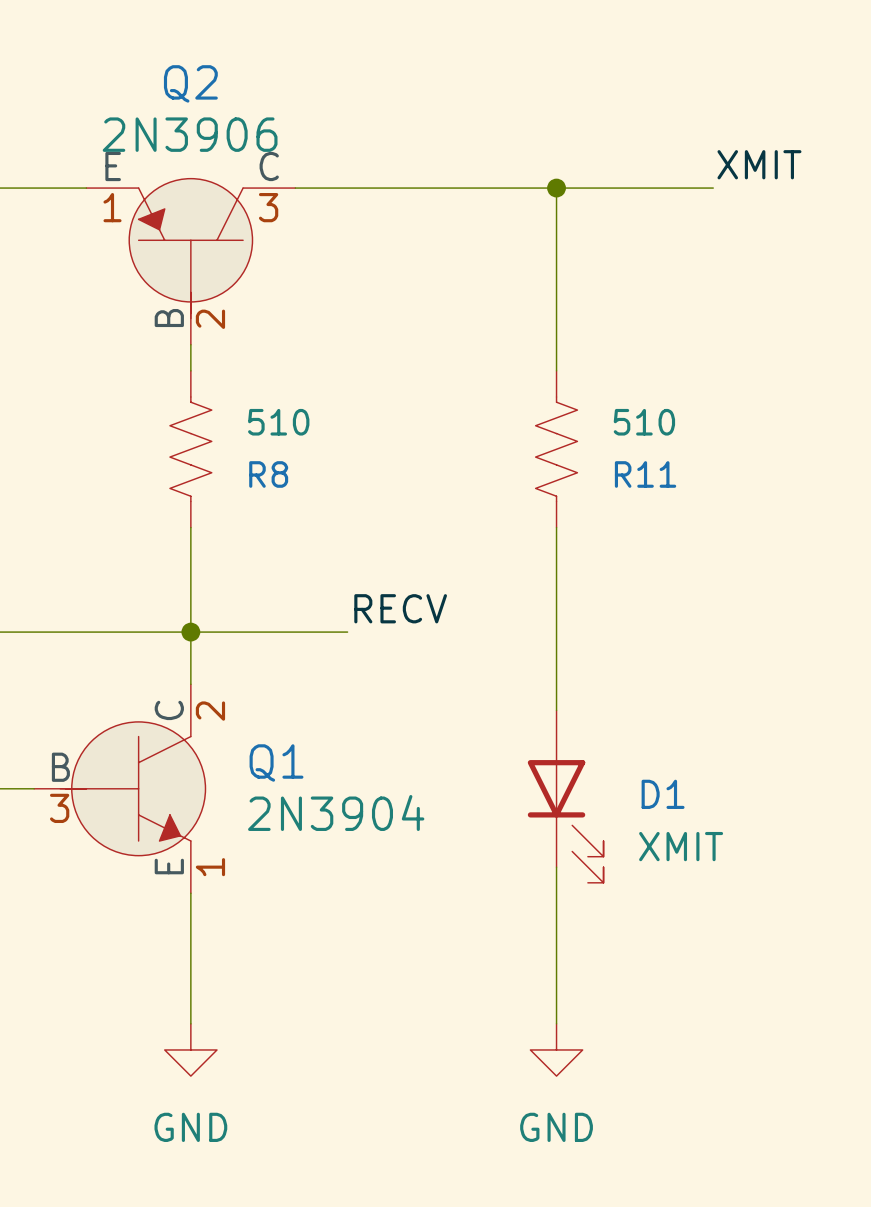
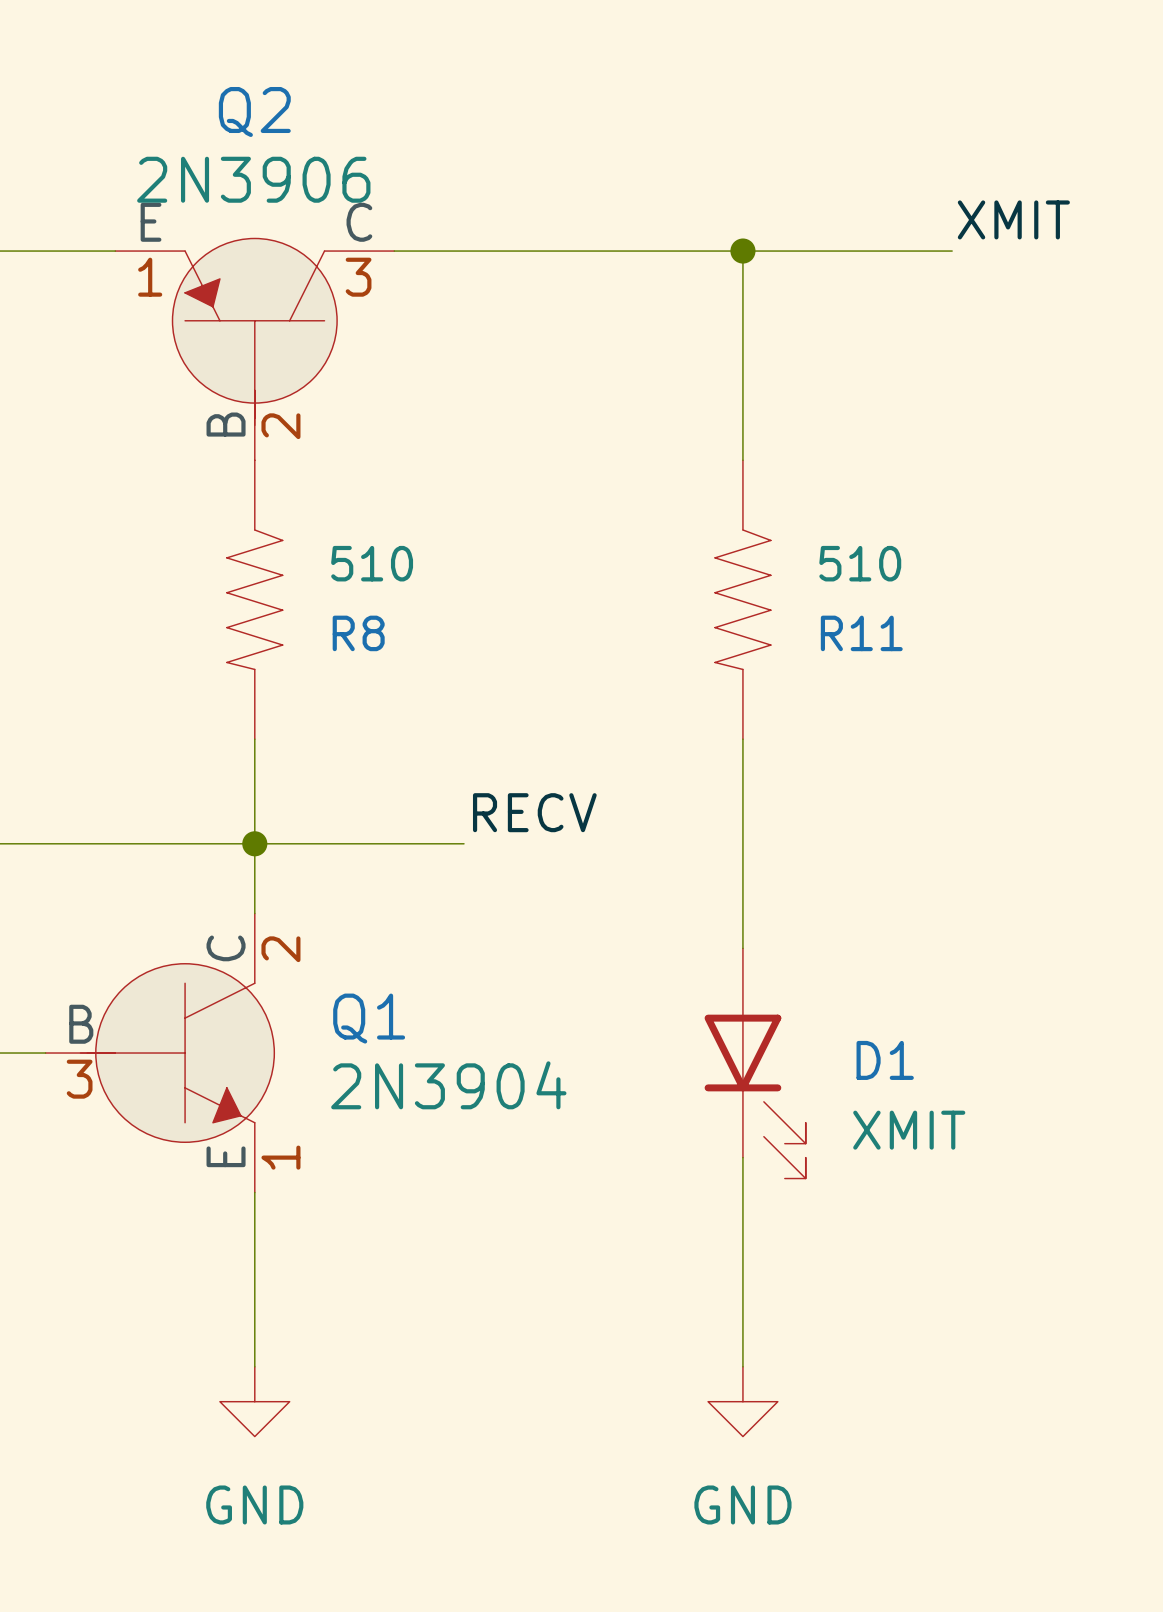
R8 symbol: [169, 370, 212, 528] -> [226, 460, 283, 740]
R11 symbol: [535, 370, 578, 528] -> [715, 460, 771, 740]

